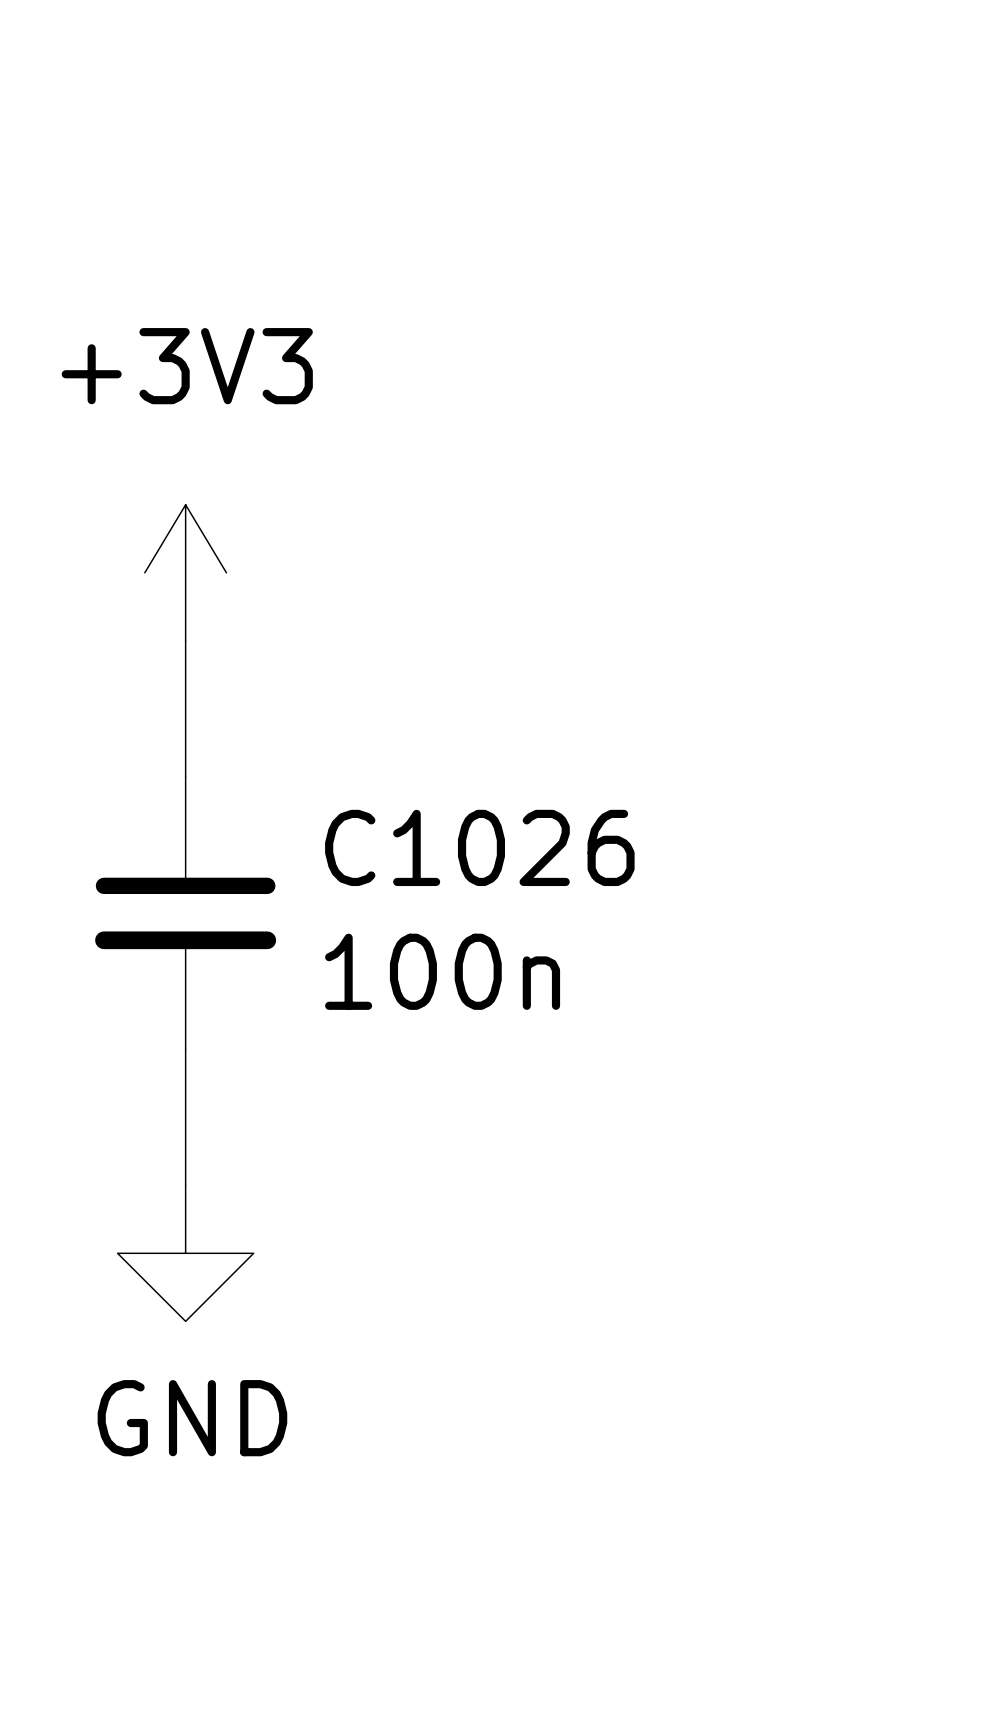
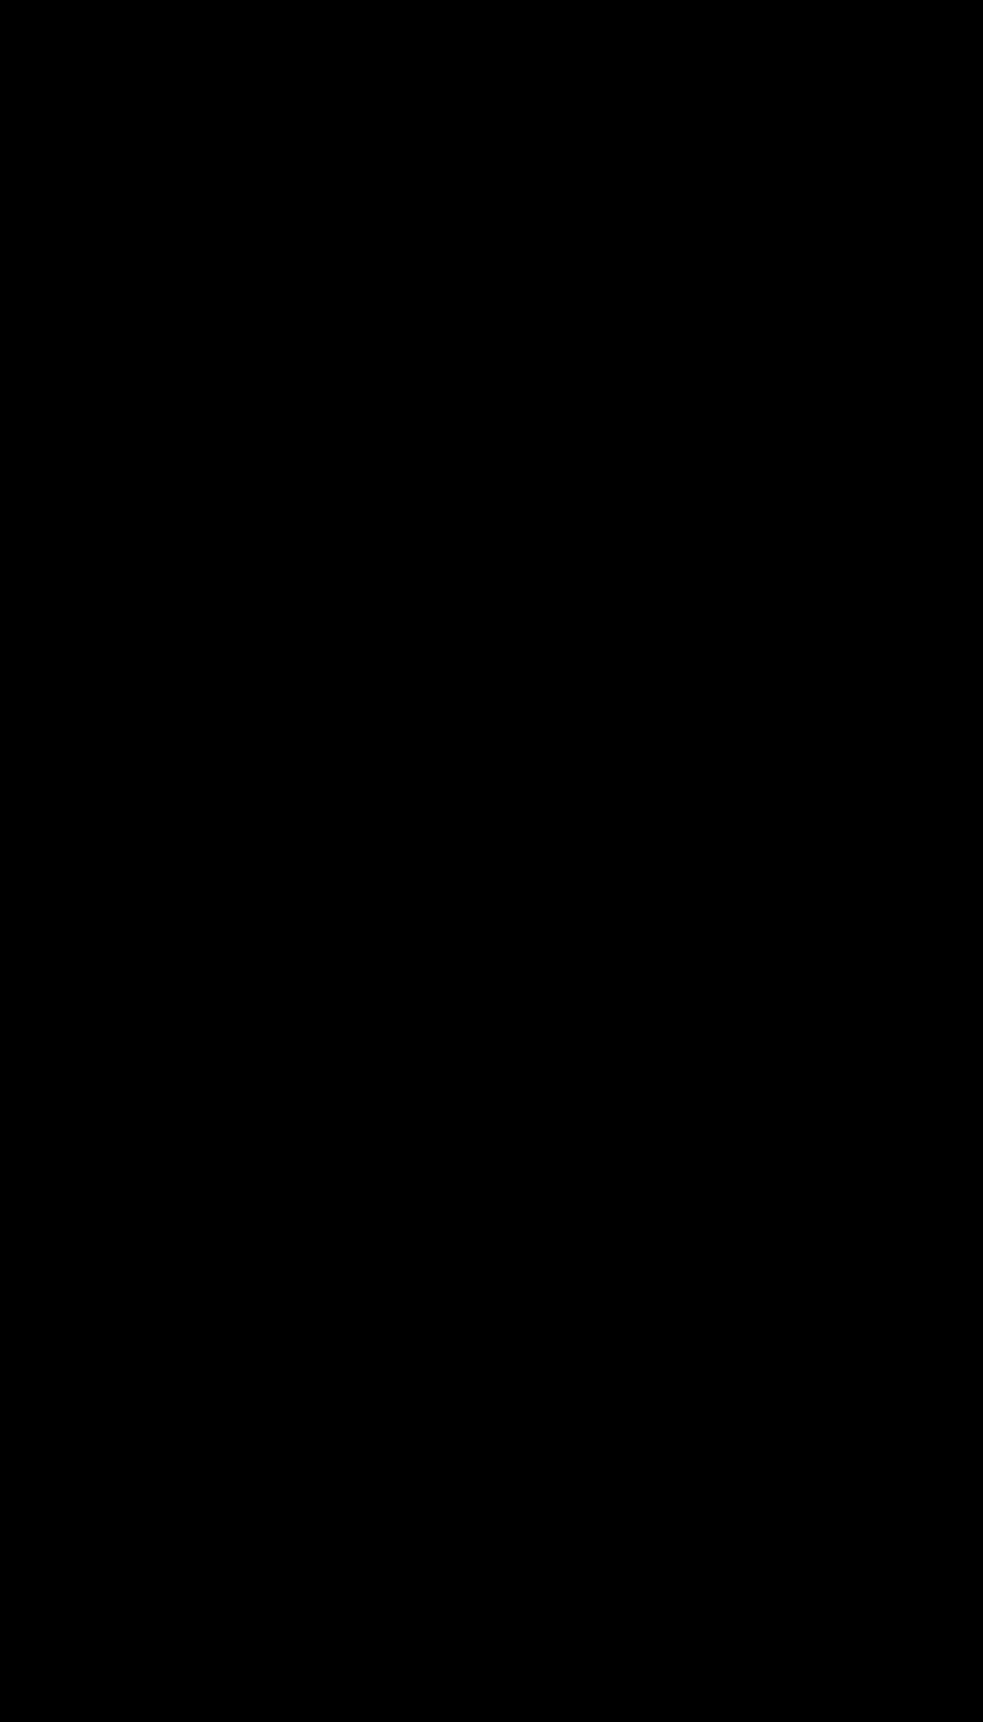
power symbol: +3V3 (185, 572) -> none
wire: (185, 640) (185, 776) -> none
C1026: 100n (185, 913) -> none
wire: (185, 1049) (185, 1185) -> none
power symbol: GND (185, 1253) -> none

